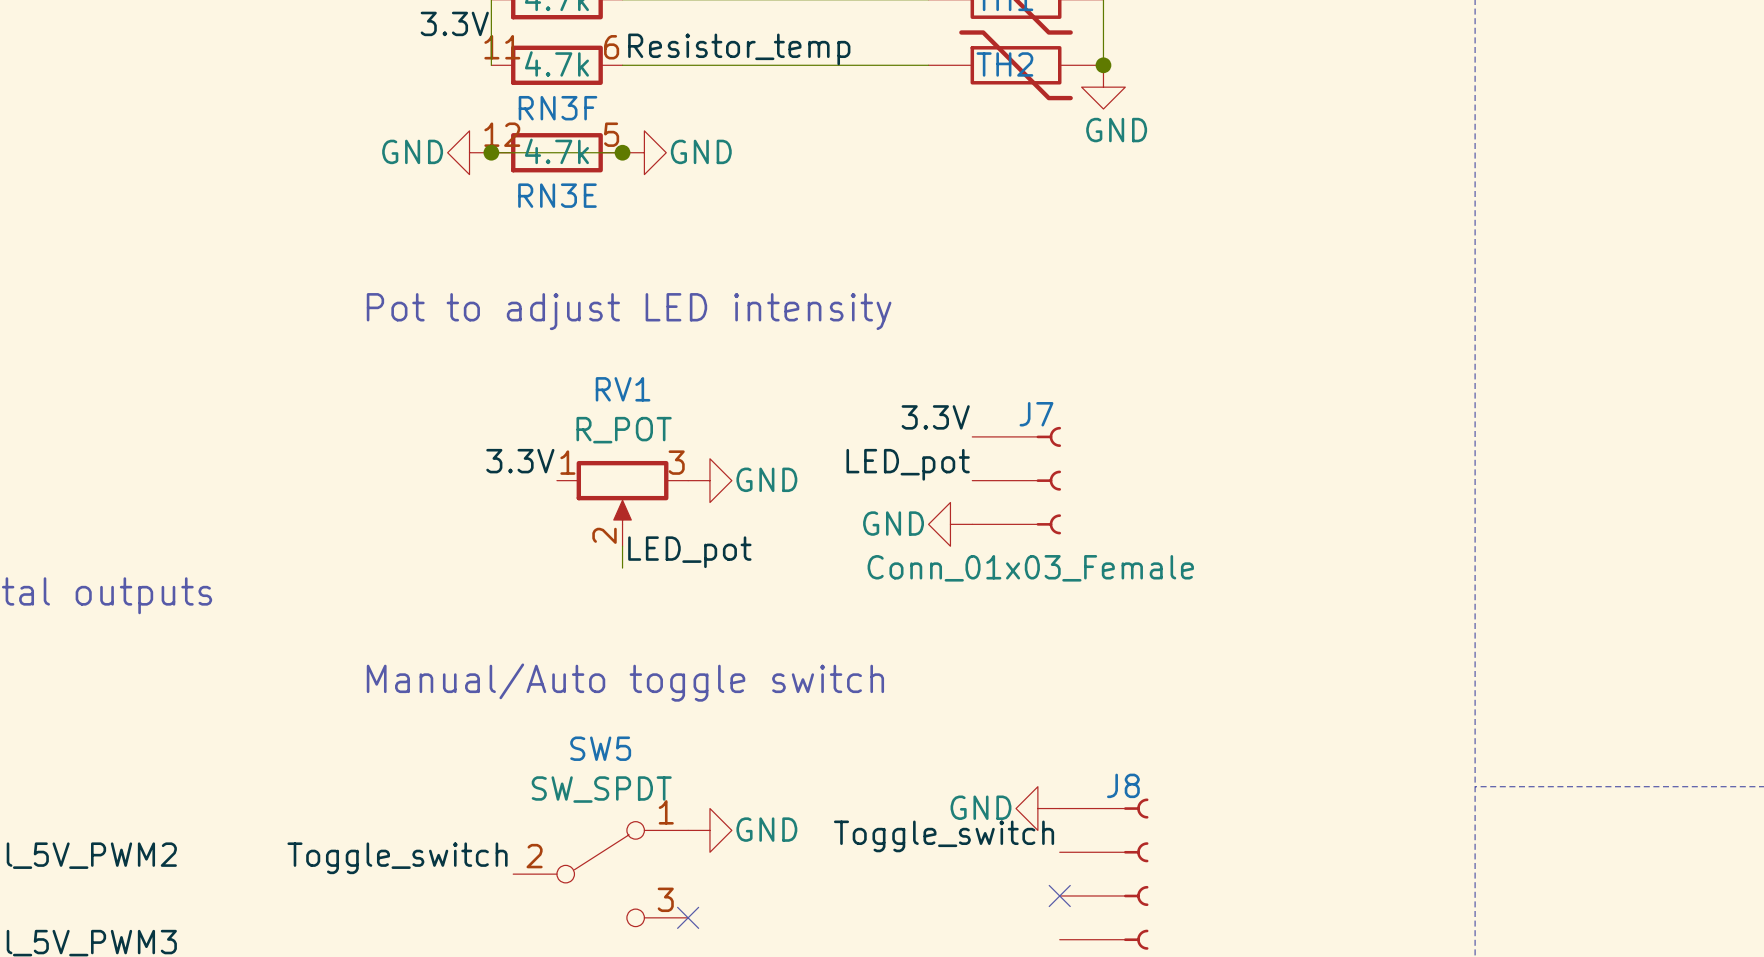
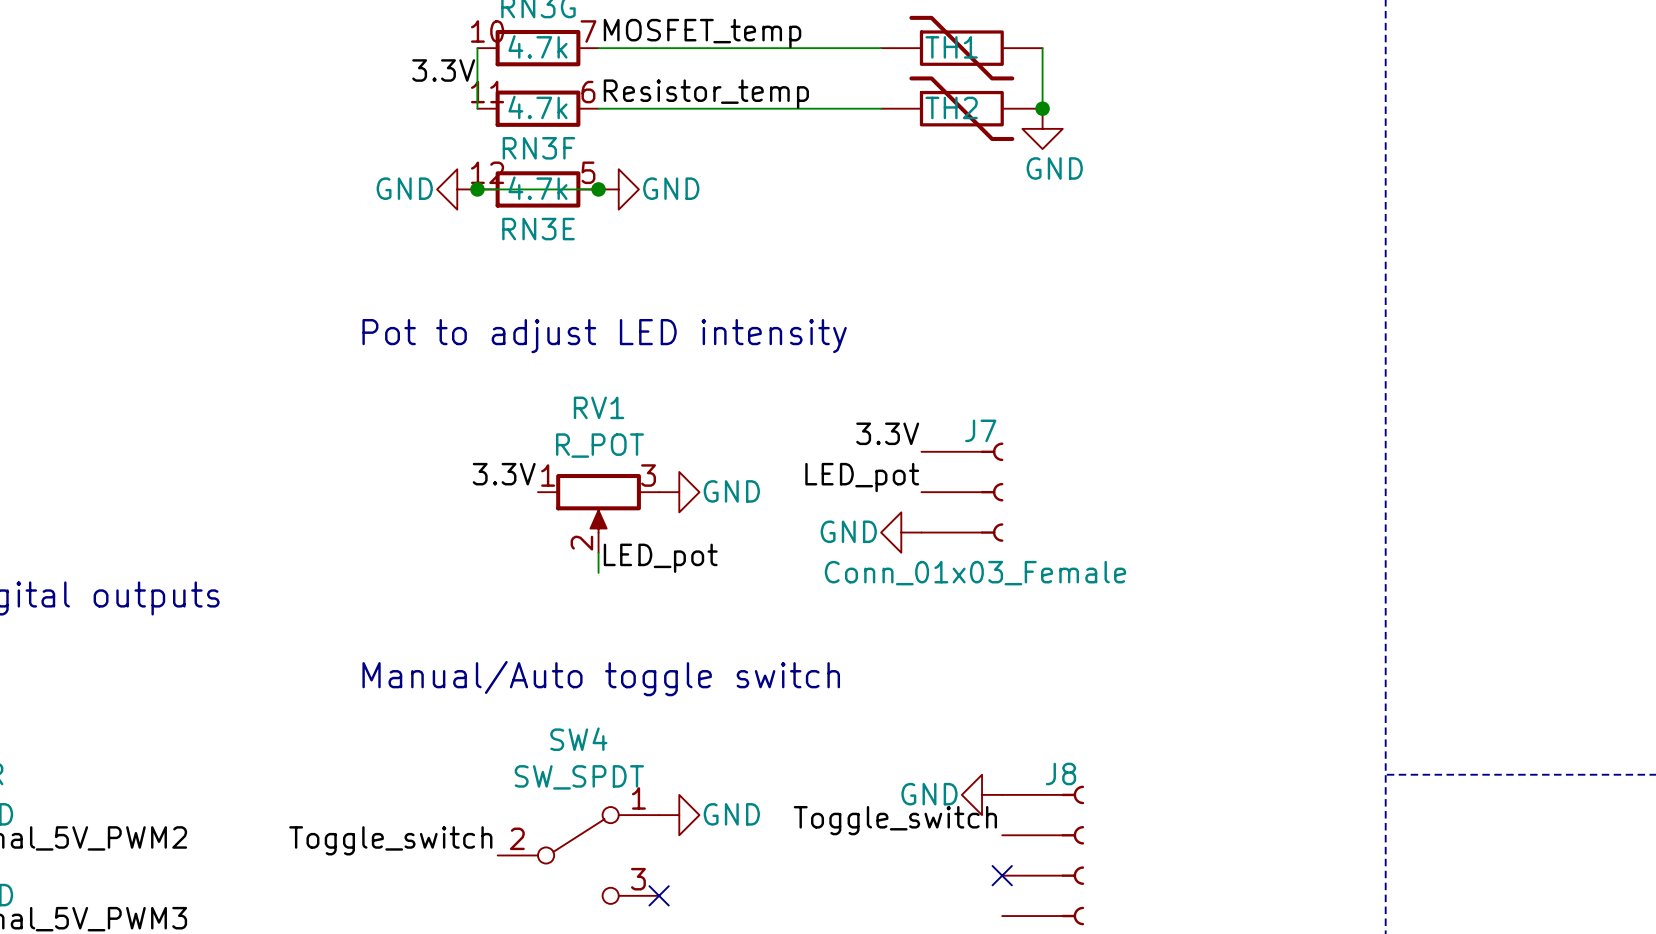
SW5 name: SW5 (600, 748) -> SW4 (578, 739)

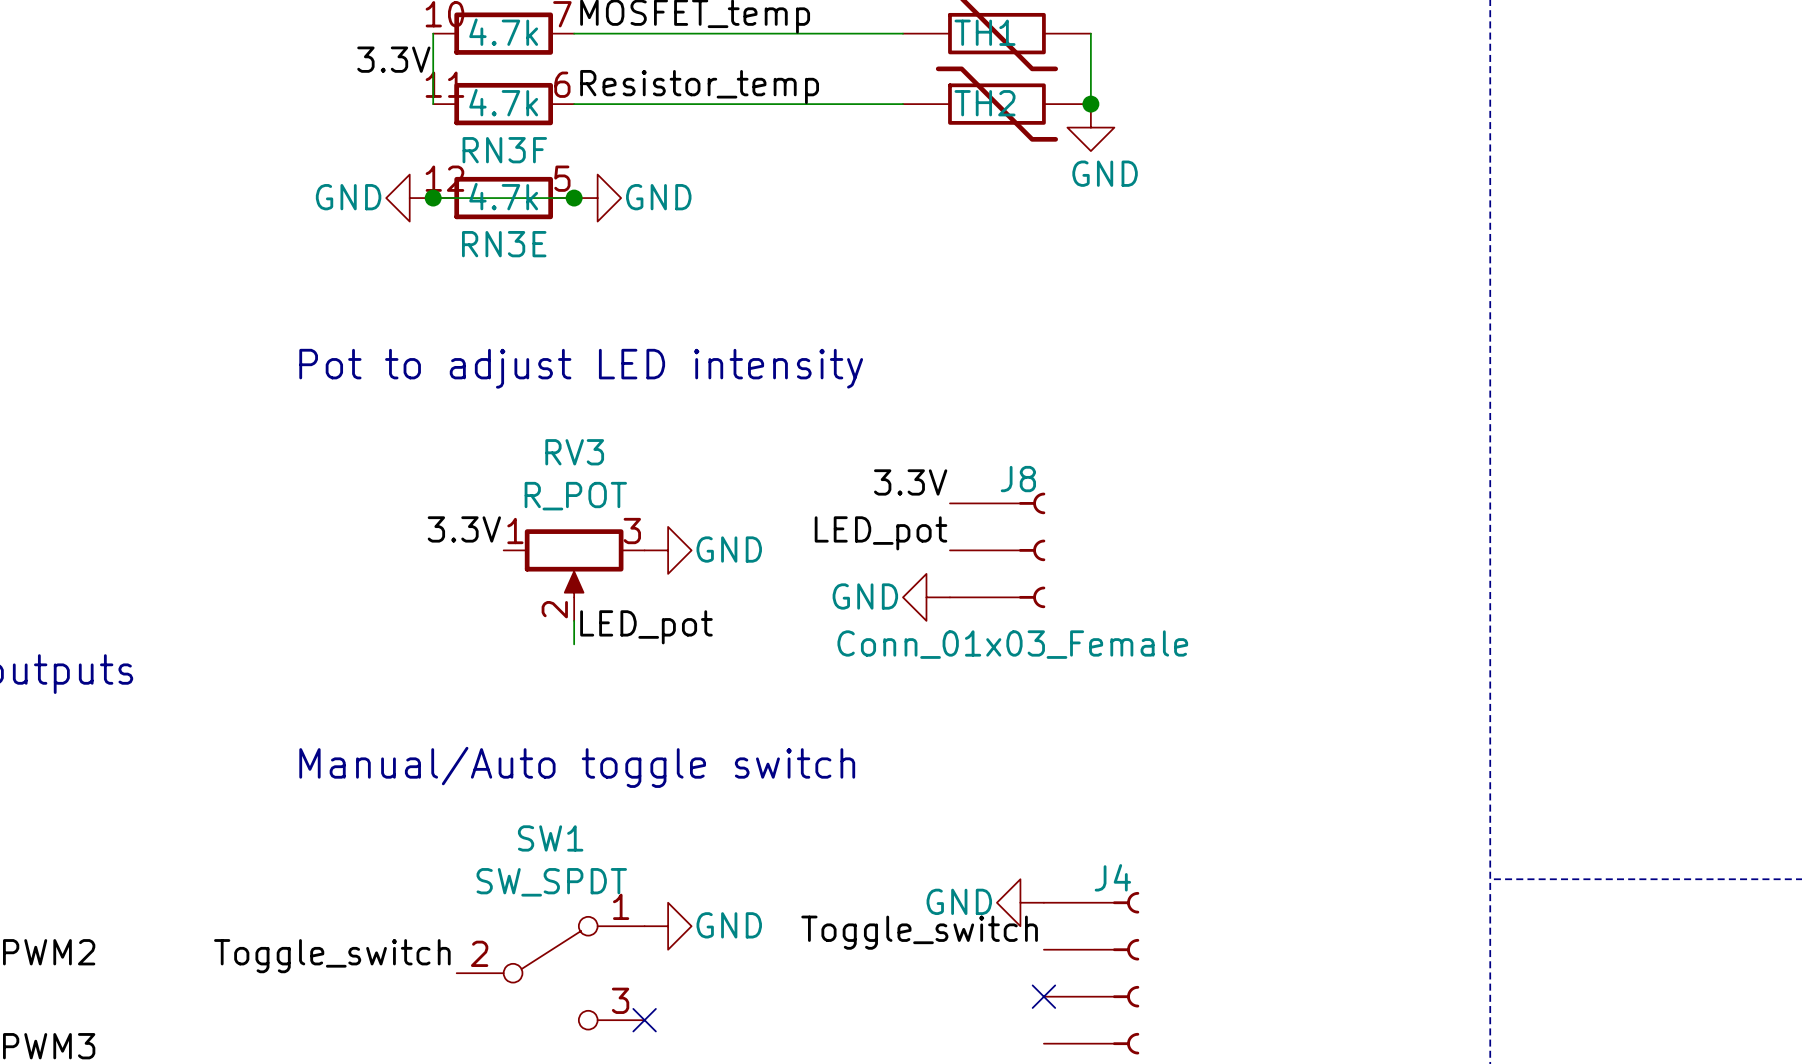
RV1 name: RV1 (599, 407) -> RV3 (574, 452)
J7 name: J7 (980, 430) -> J8 (1018, 479)
SW4 name: SW4 (578, 739) -> SW1 (550, 838)
J8 name: J8 (1060, 773) -> J4 (1112, 877)

